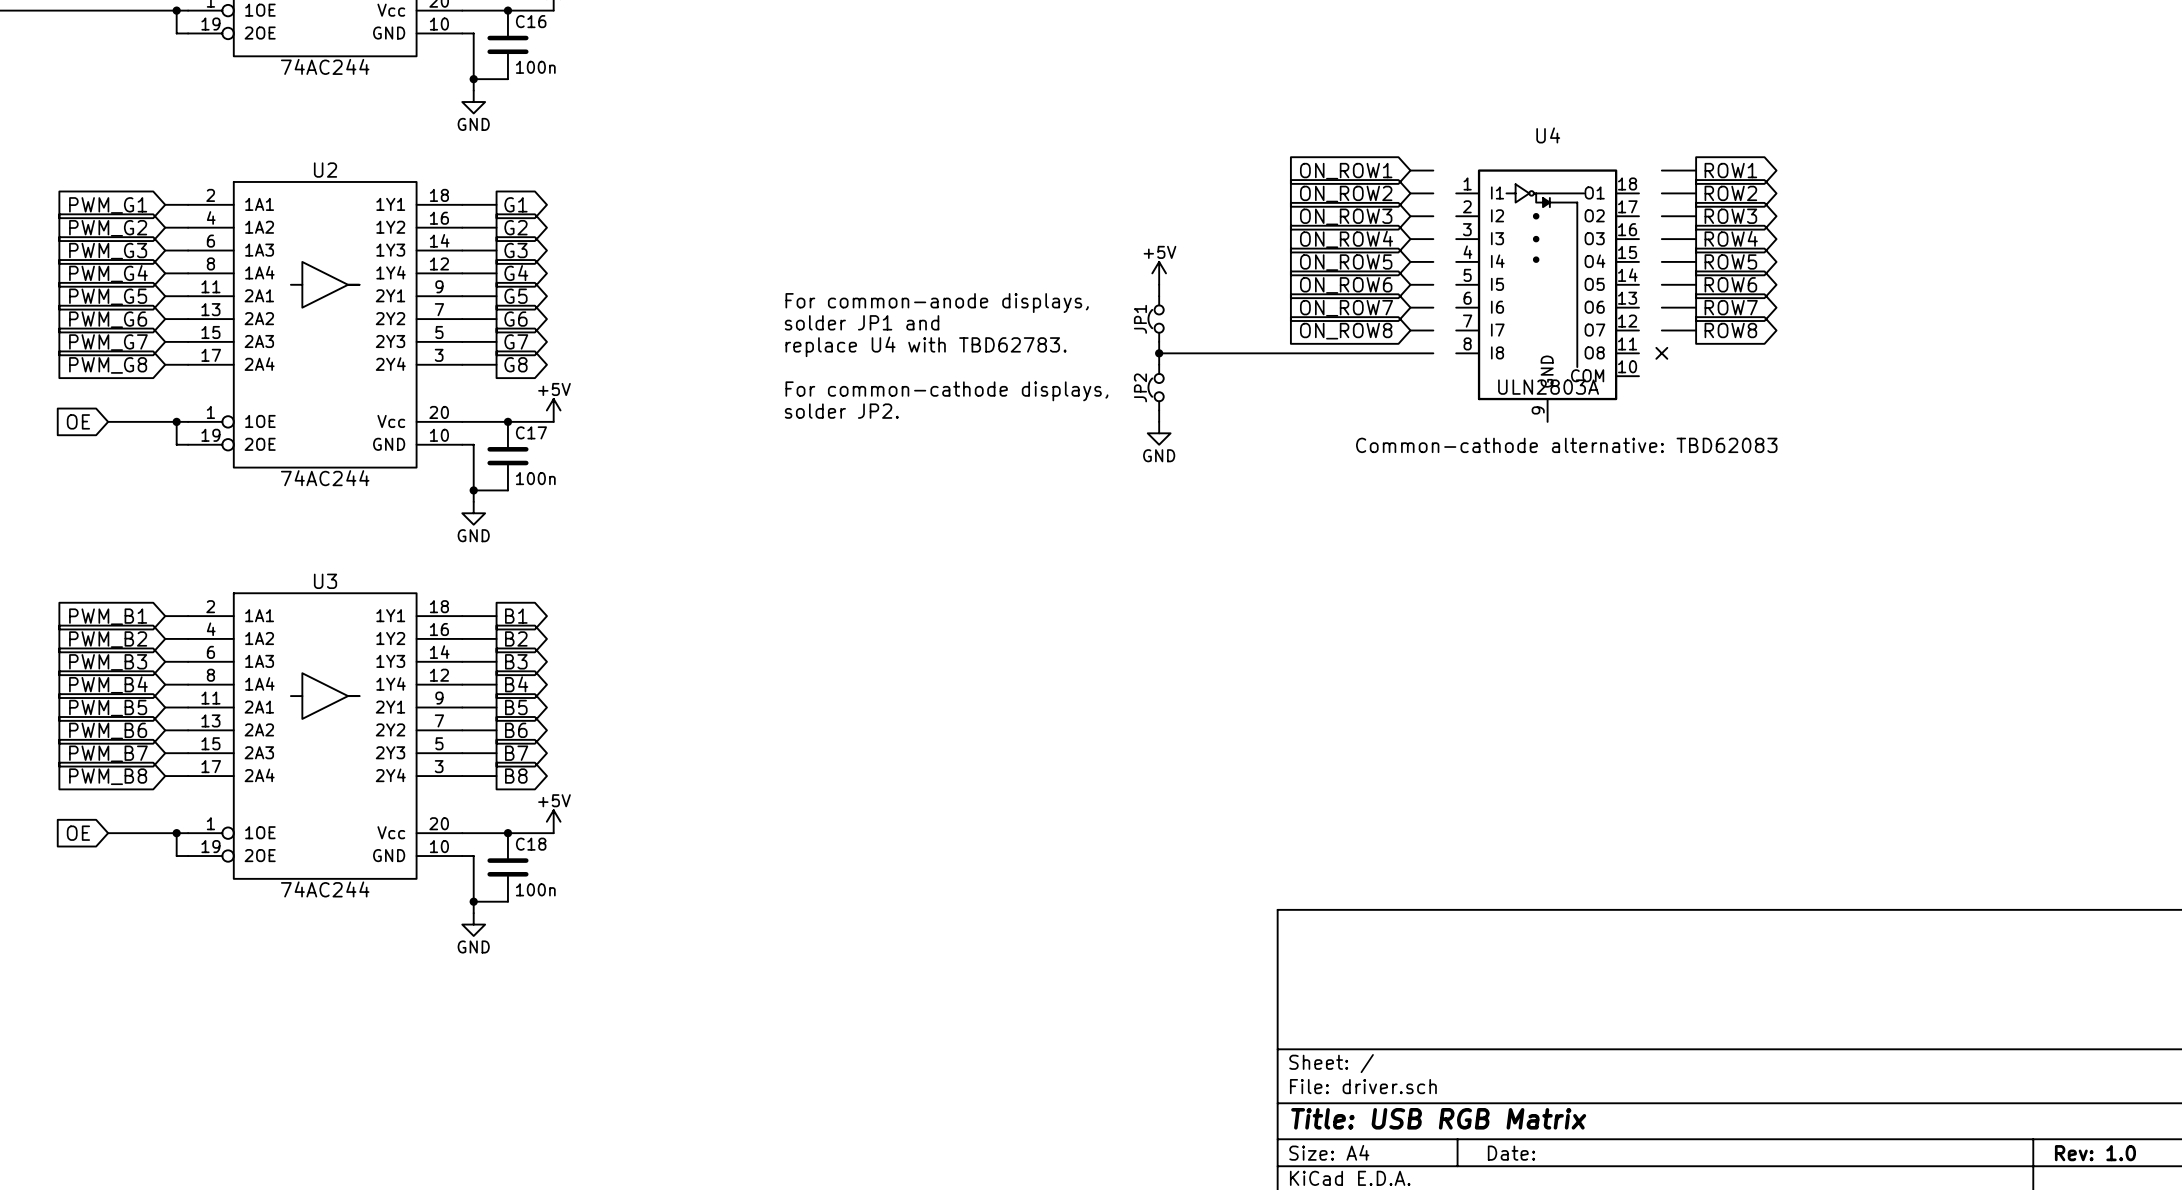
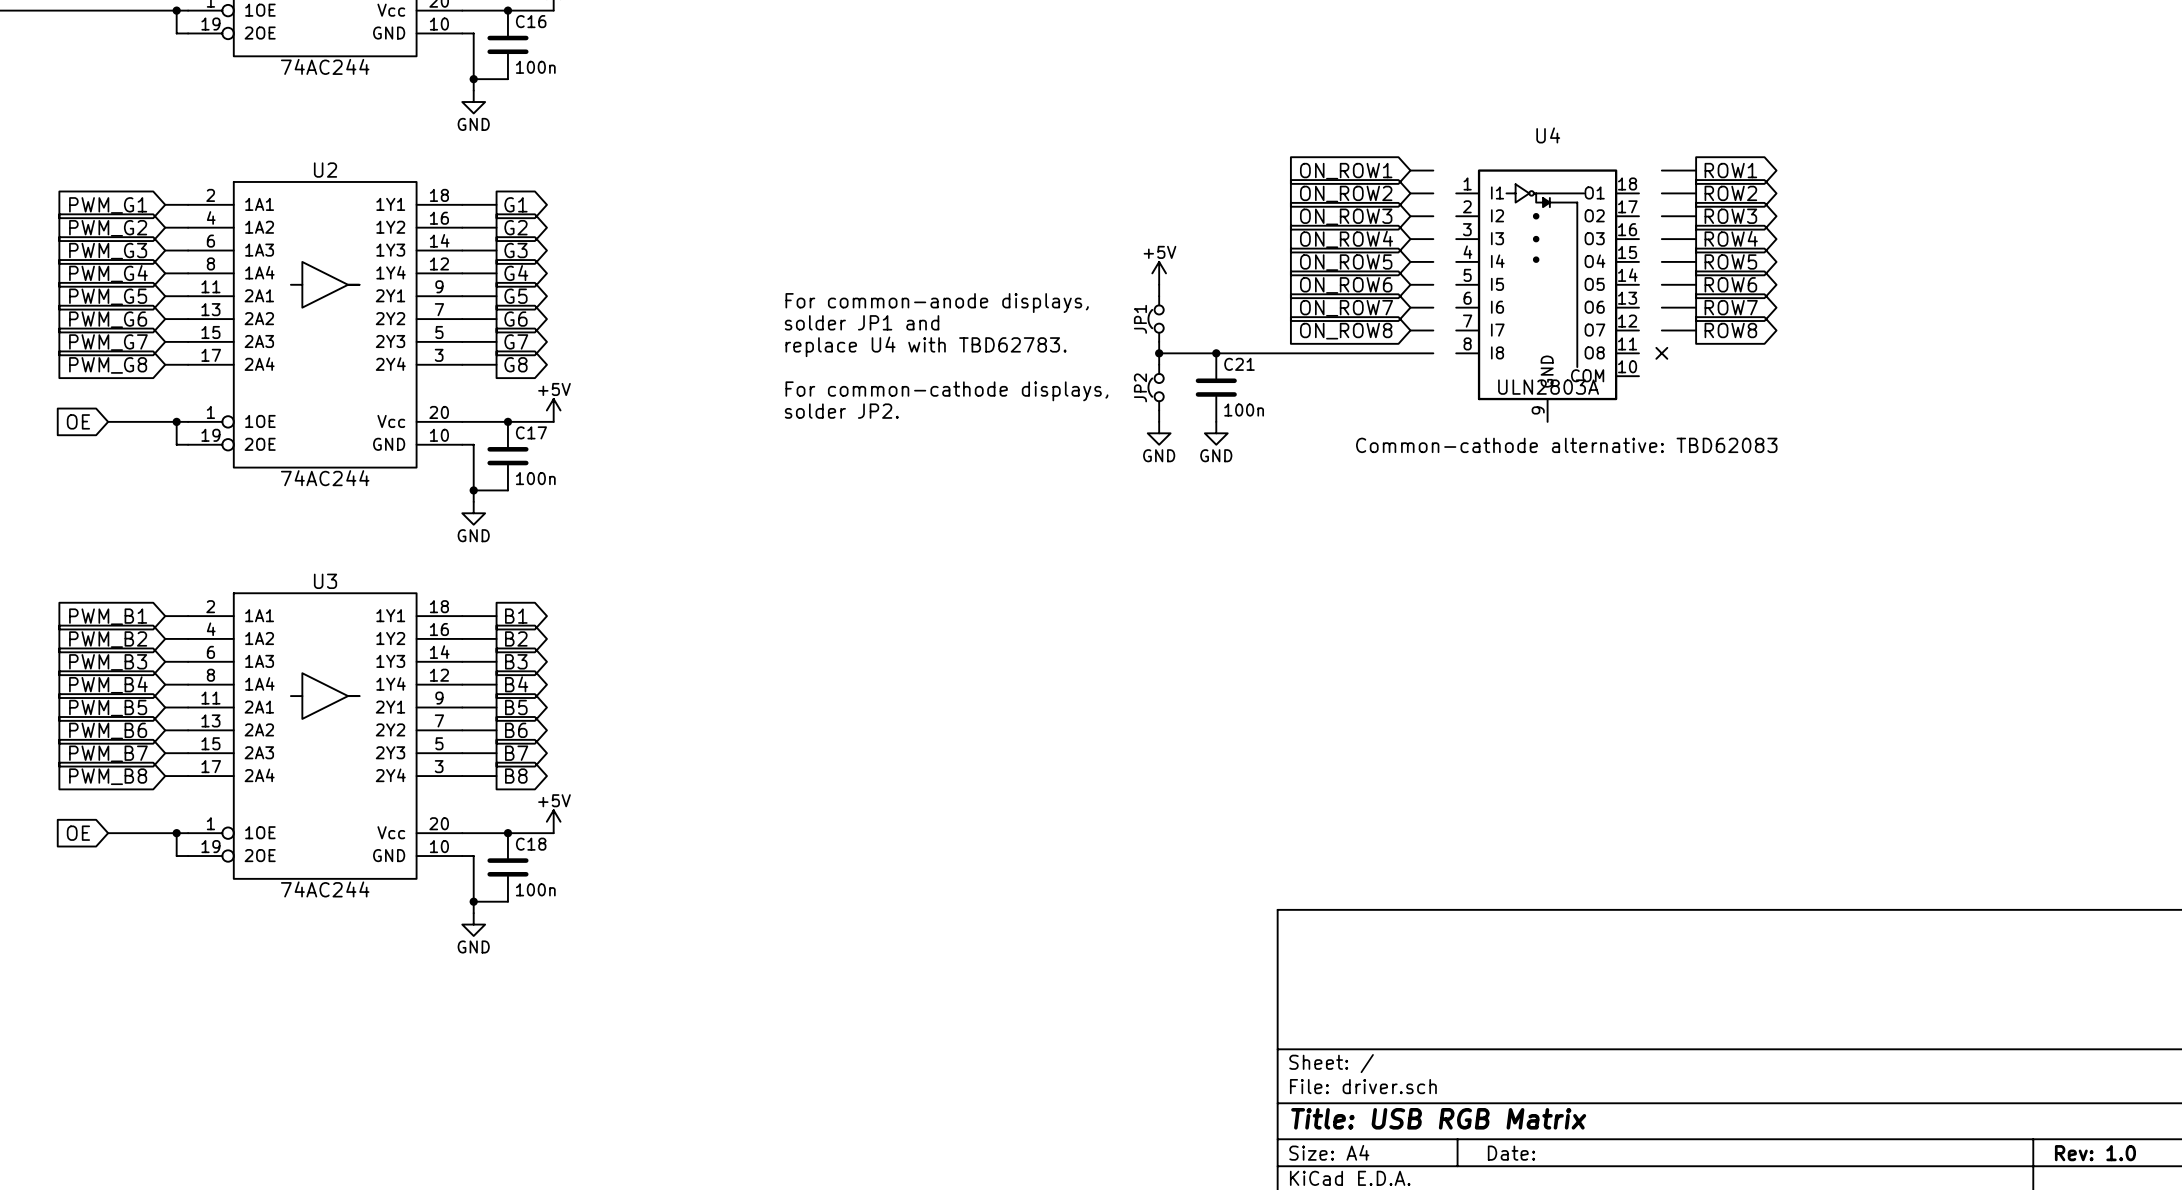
junction: none -> (1216, 353)
C21: none -> 100n (1216, 387)
power symbol: none -> GND (1216, 433)

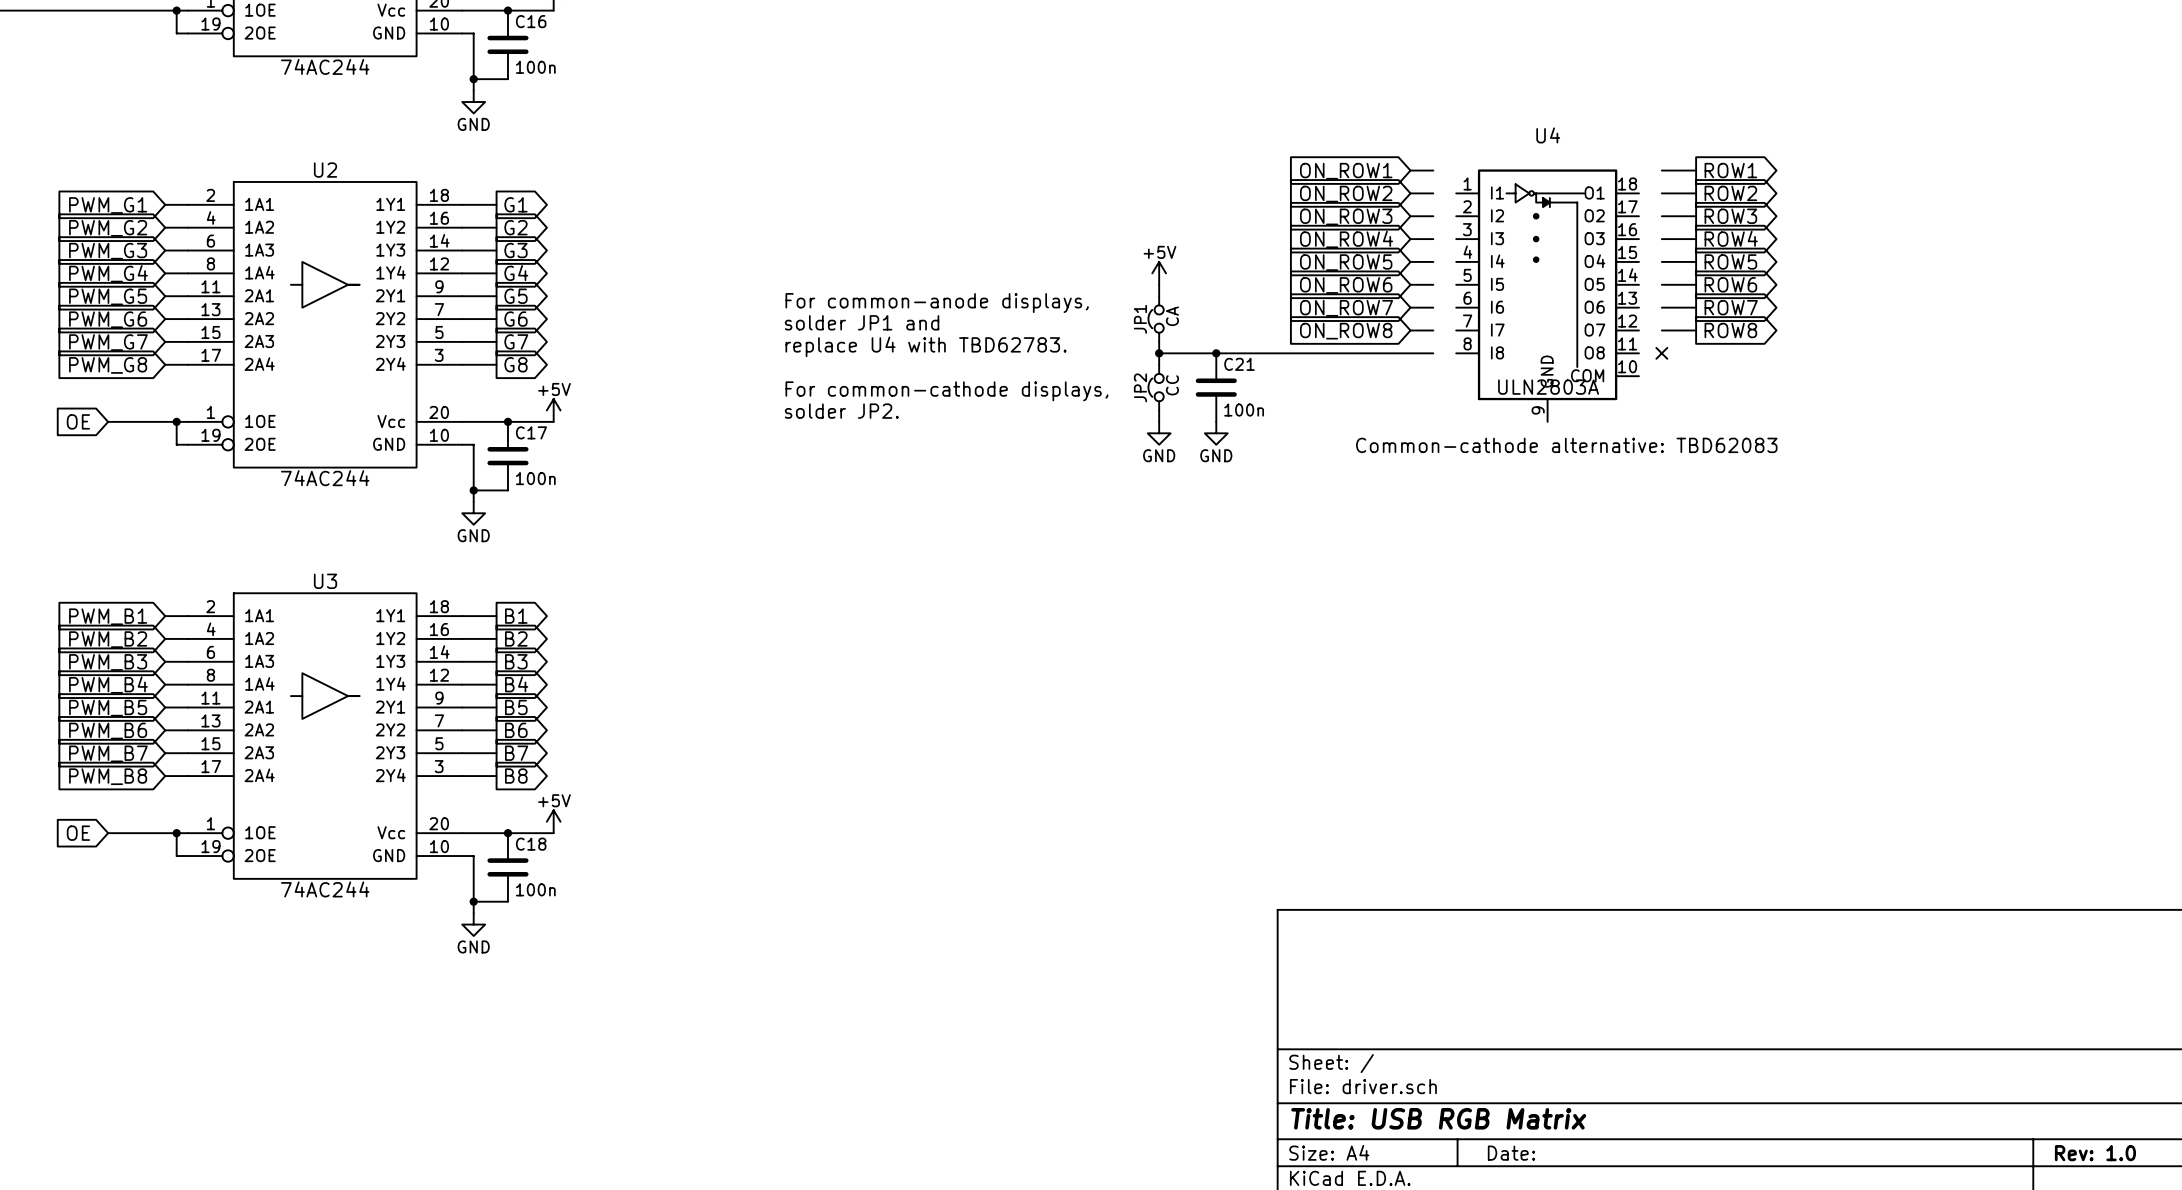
JP1 value: none -> CA (1172, 316)
JP2 value: none -> CC (1172, 385)

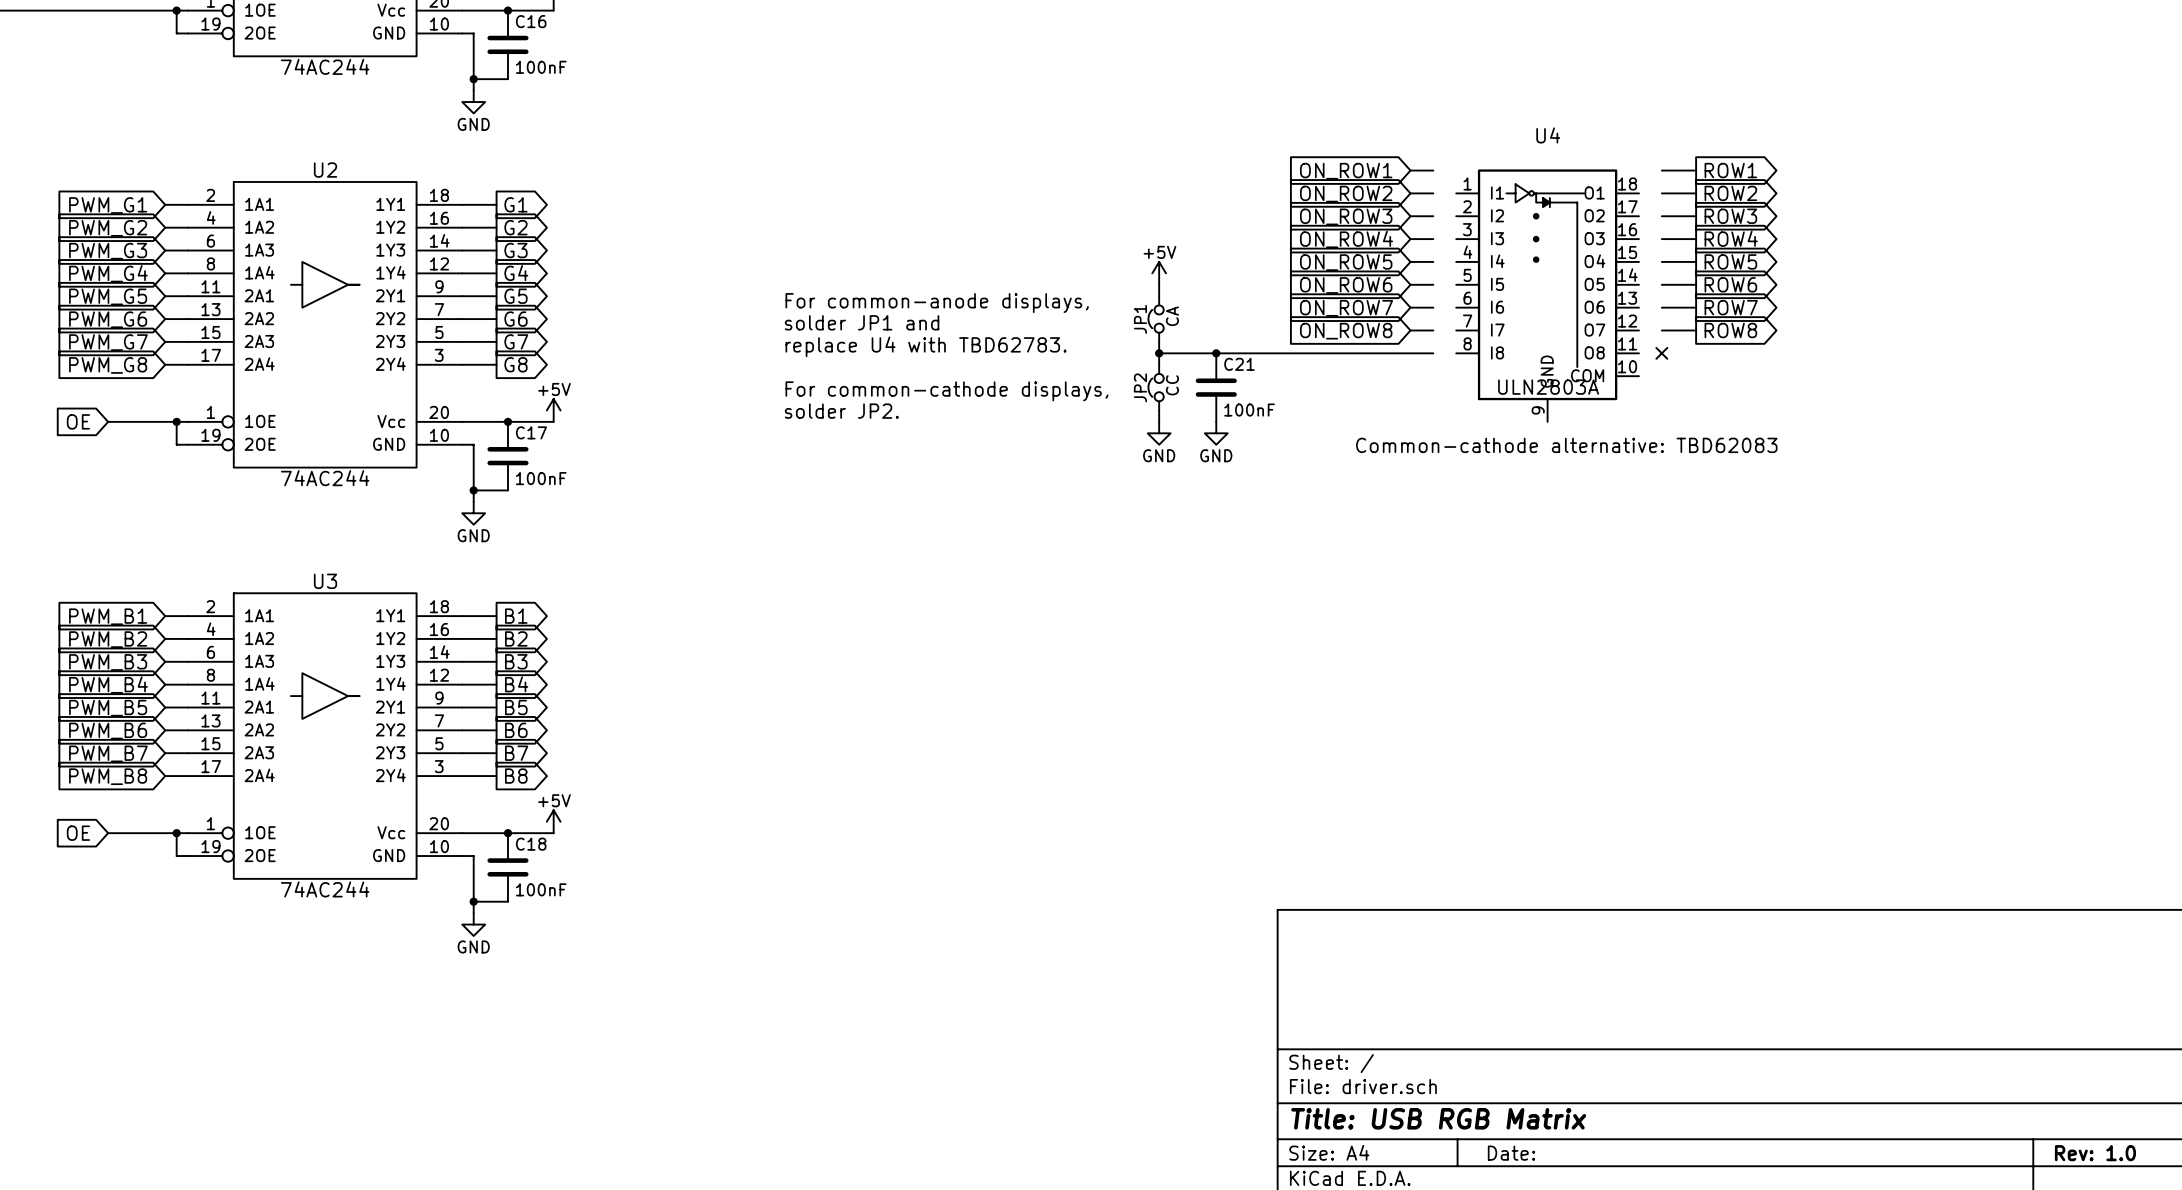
C16 value: 100n (535, 67) -> 100nF (541, 67)
C21 value: 100n (1244, 410) -> 100nF (1249, 410)
C17 value: 100n (535, 478) -> 100nF (541, 478)
C18 value: 100n (535, 889) -> 100nF (541, 889)

